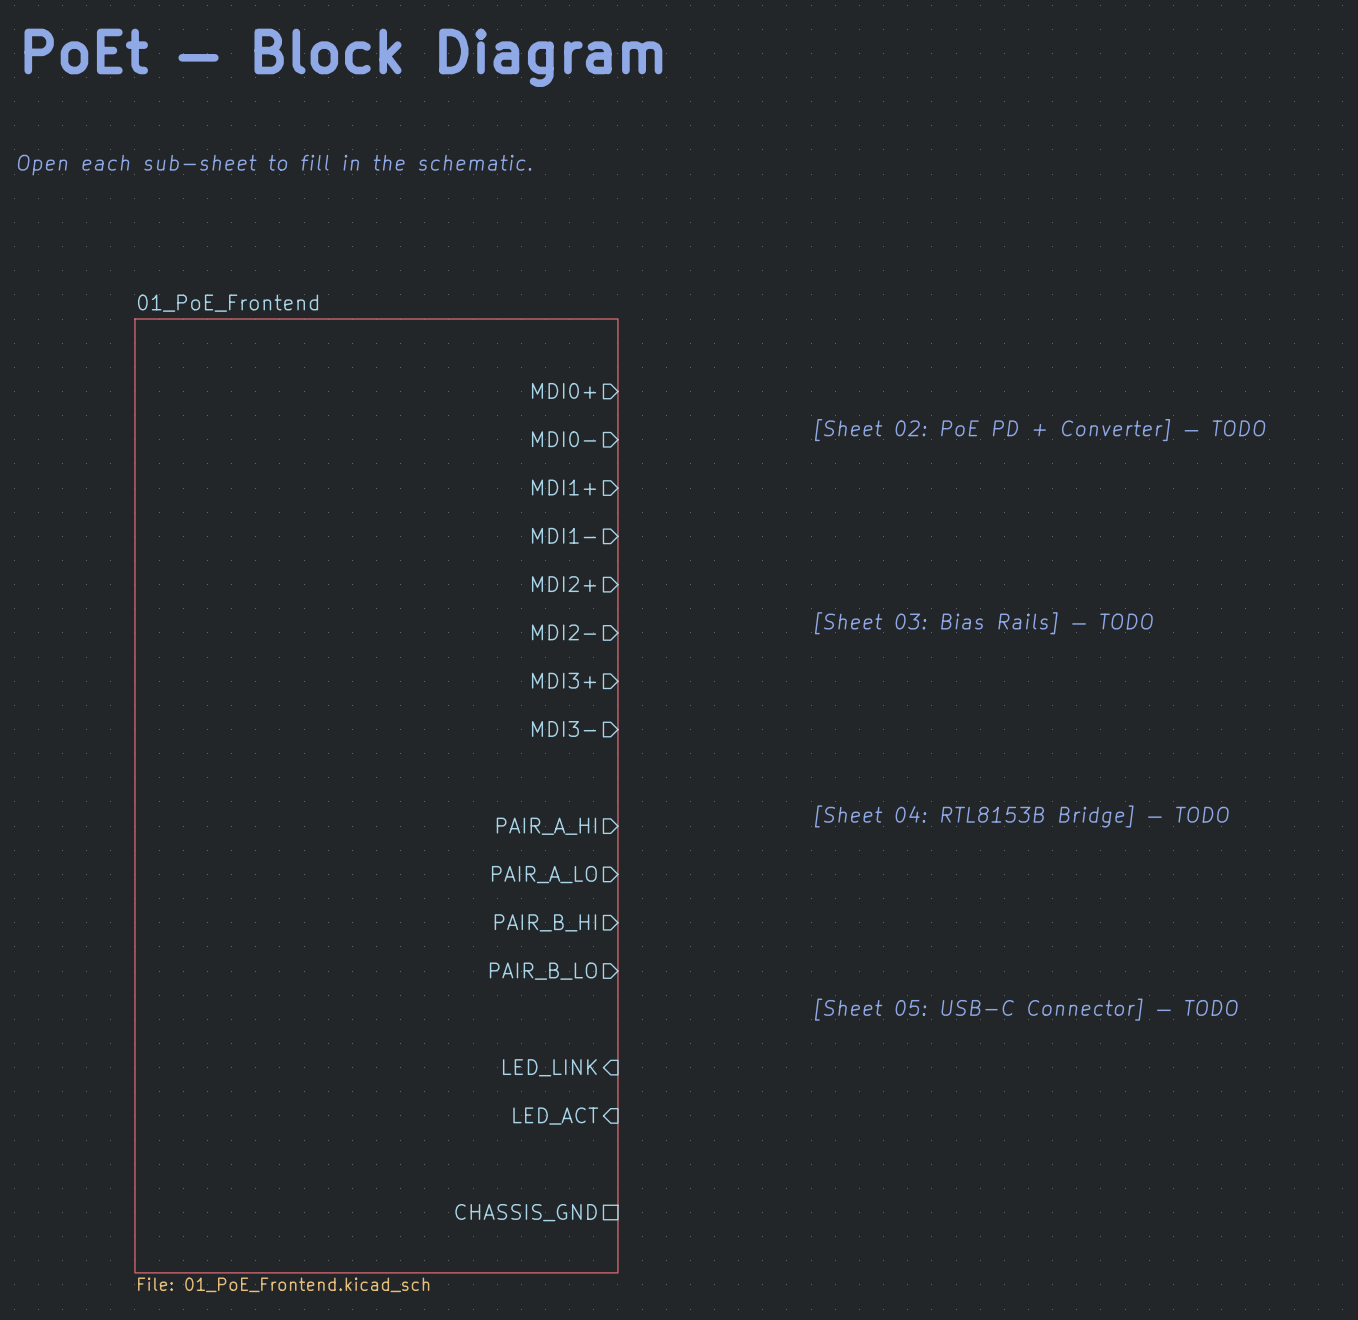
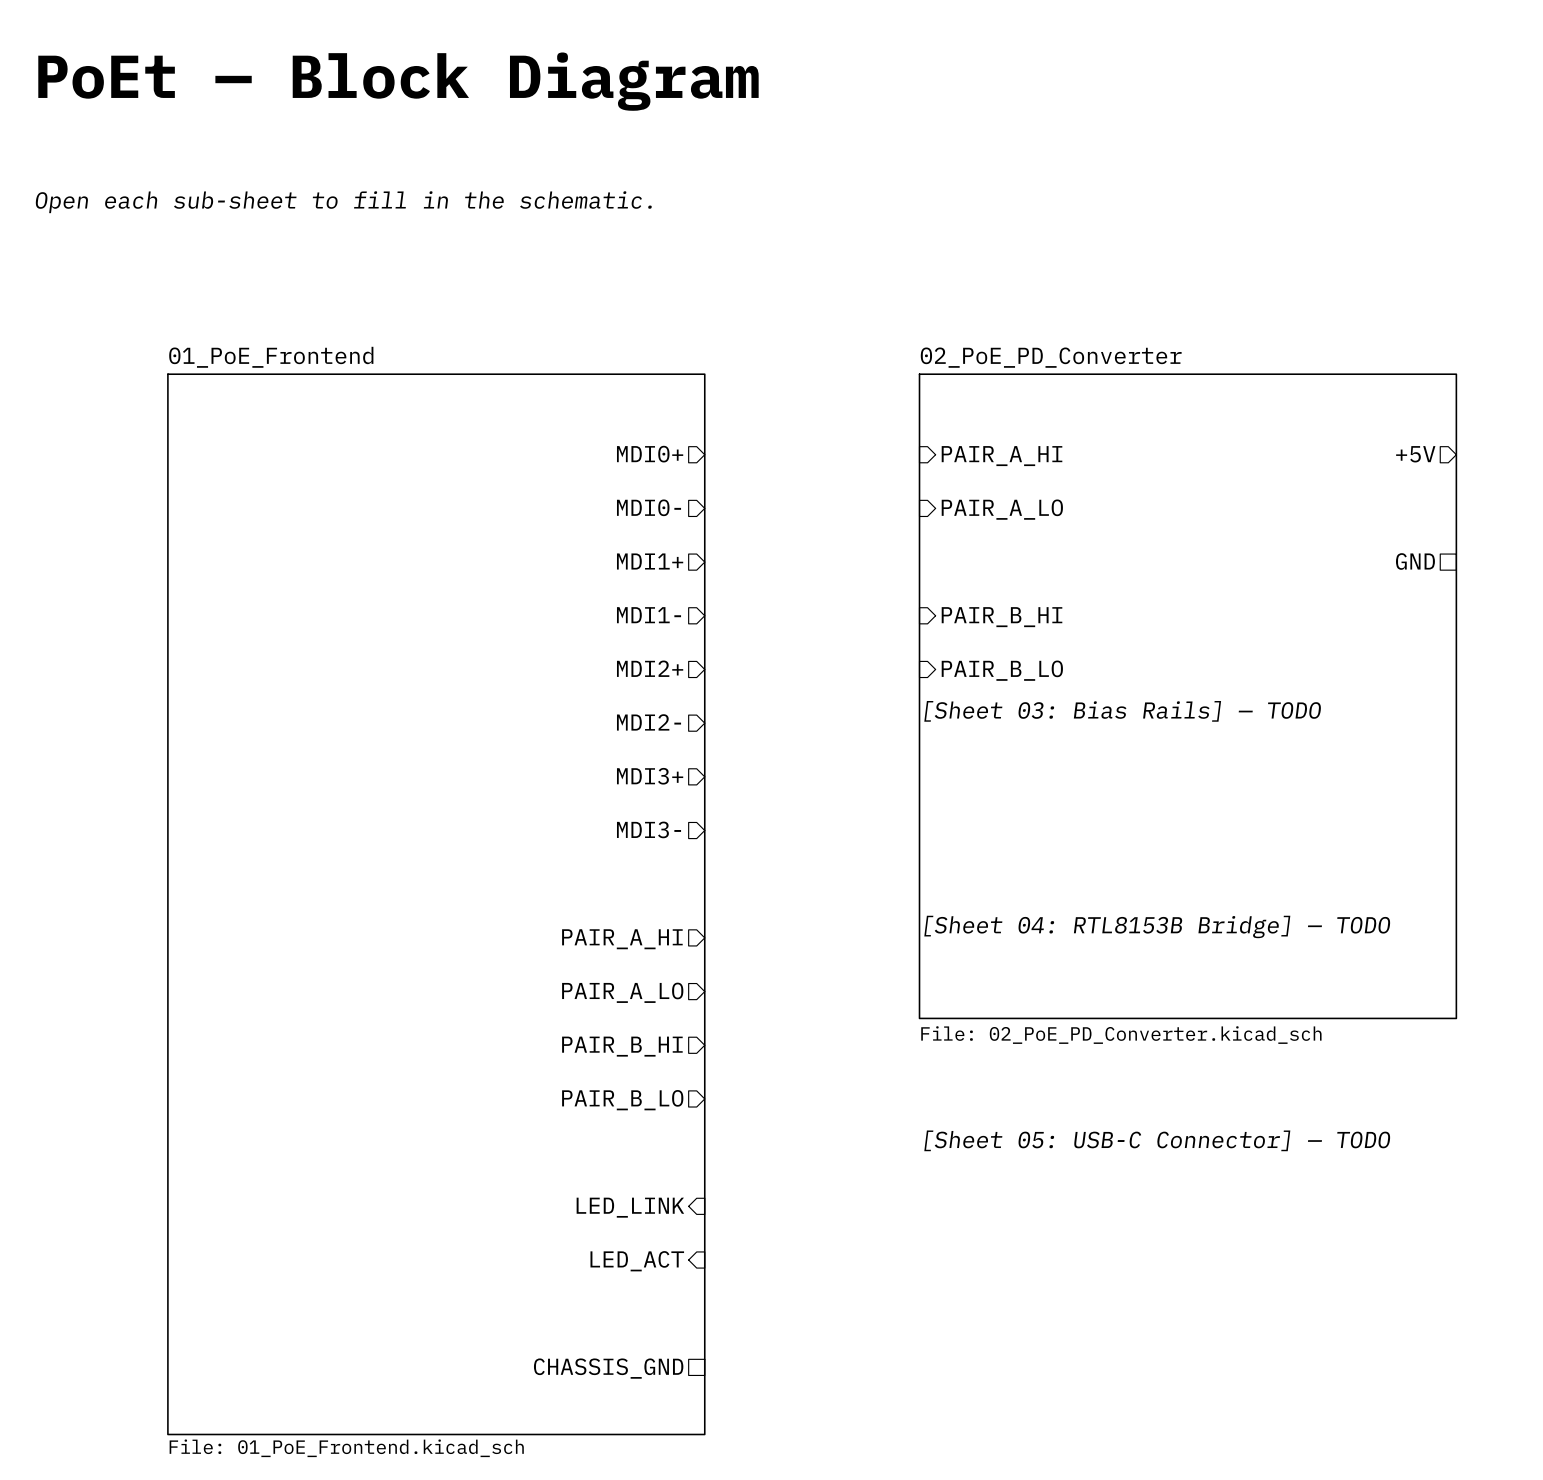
sheet pin: none -> +5V (1415, 454)
sheet pin: none -> PAIR_A_HI (1002, 456)
text: [Sheet 02: PoE PD + Converter] — TODO (1040, 430) -> none
sheet pin: none -> PAIR_A_LO (1002, 509)
sheet pin: none -> GND (1415, 561)
sheet pin: none -> PAIR_B_HI (1002, 617)
sheet pin: none -> PAIR_B_LO (1002, 670)
sheet 02_PoE_PD_Converter: none -> File: 02_PoE_PD_Converter.kicad_sch (1187, 696)

